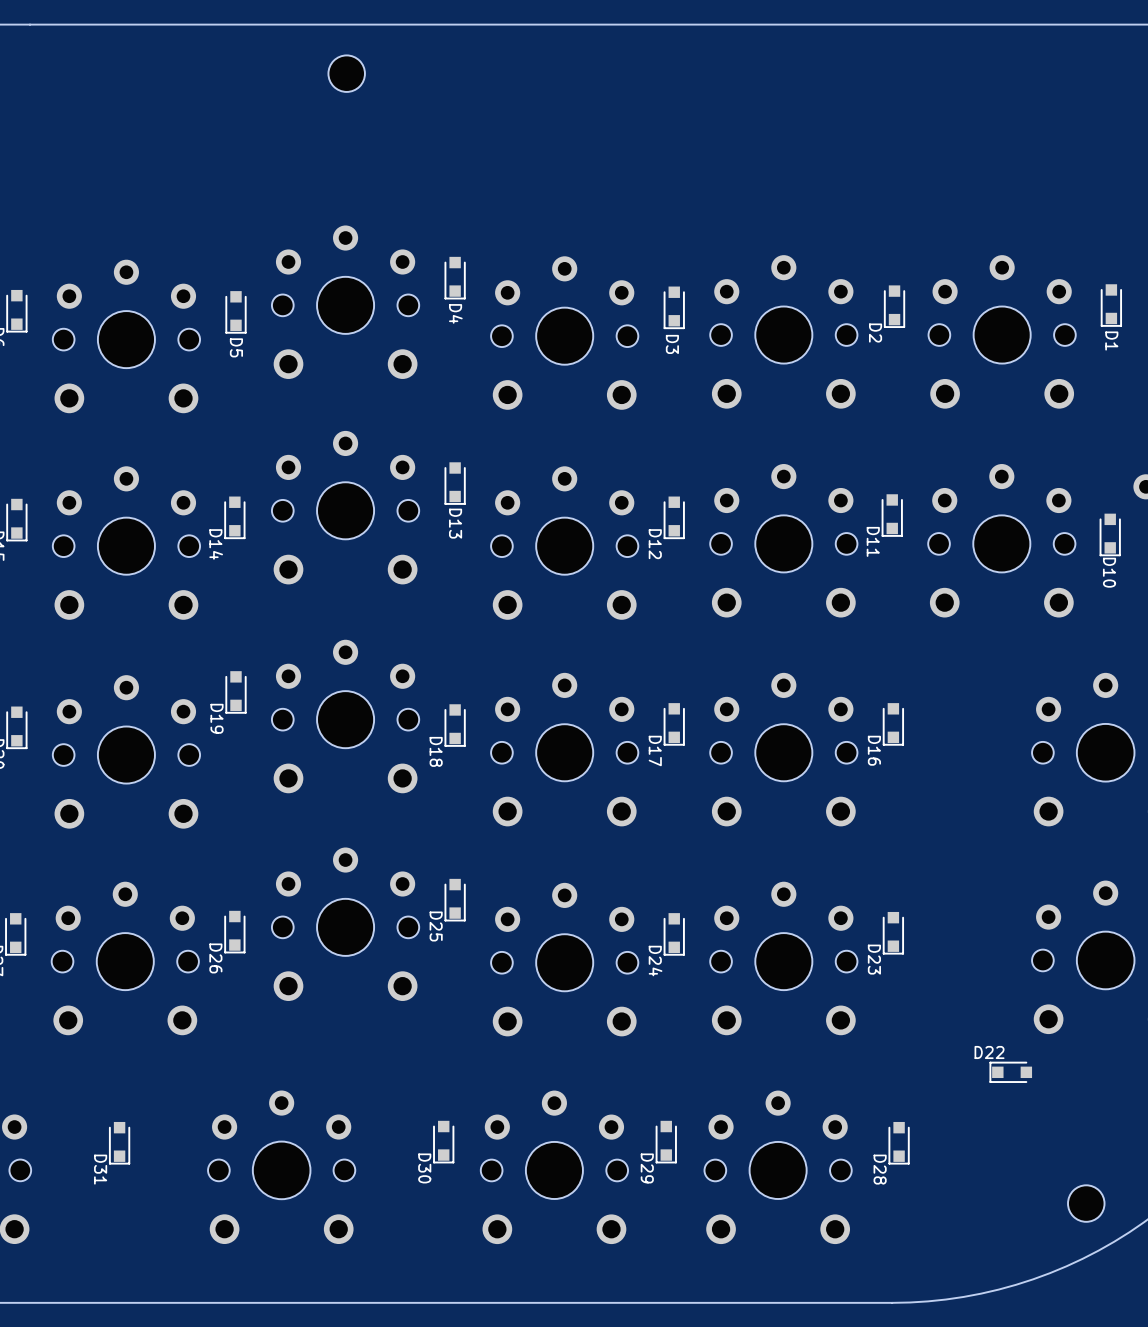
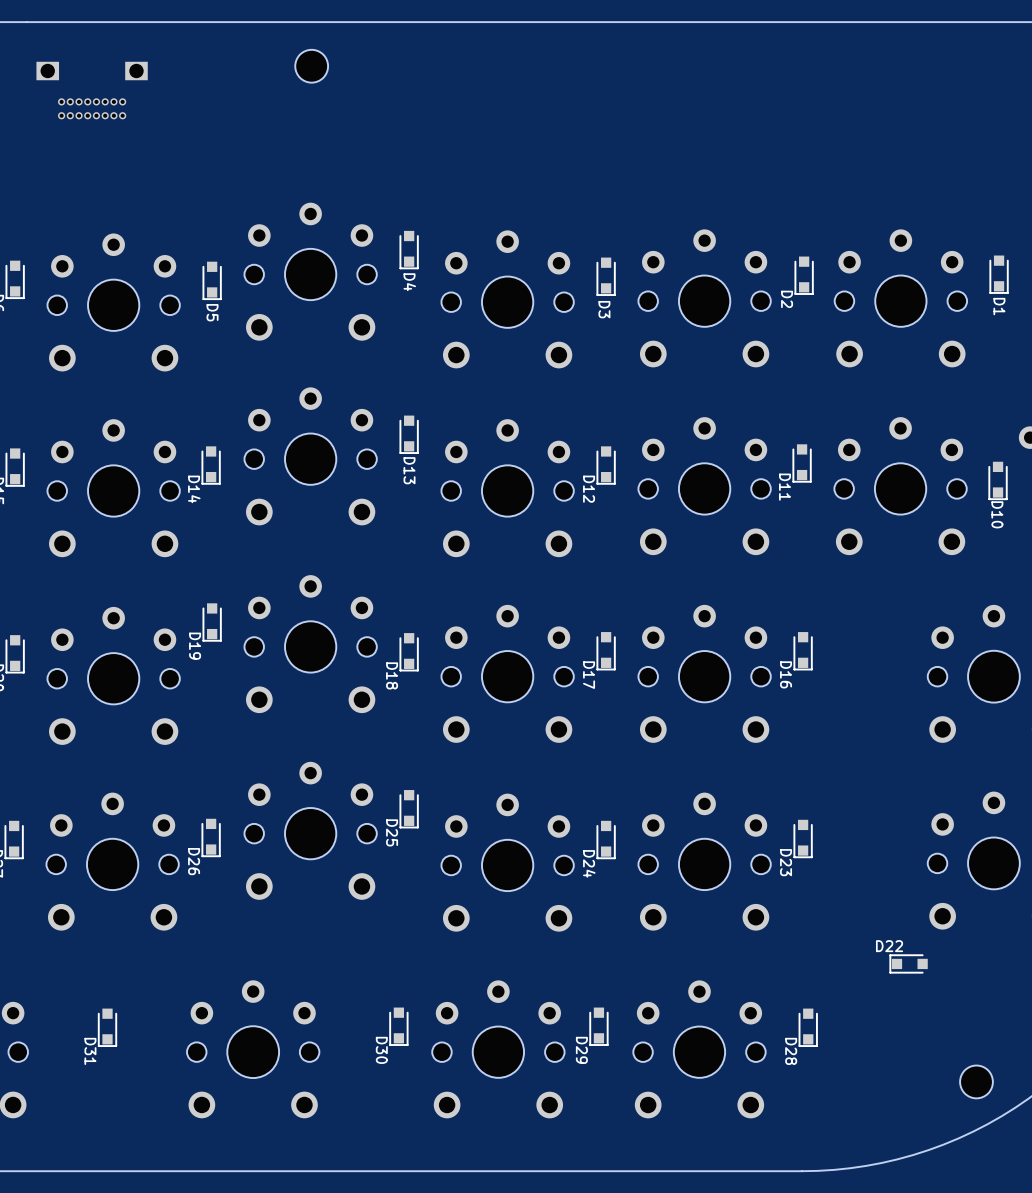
part: none -> (92, 90)

